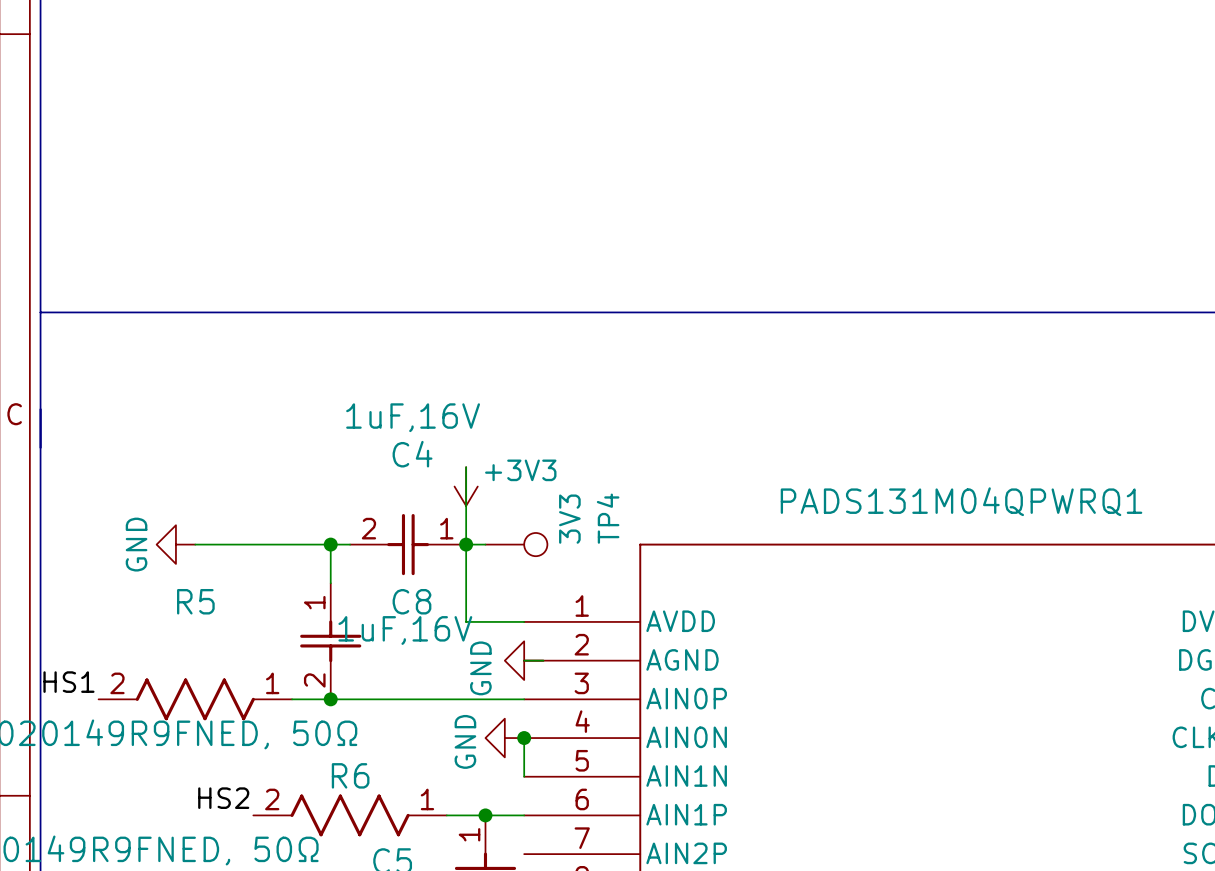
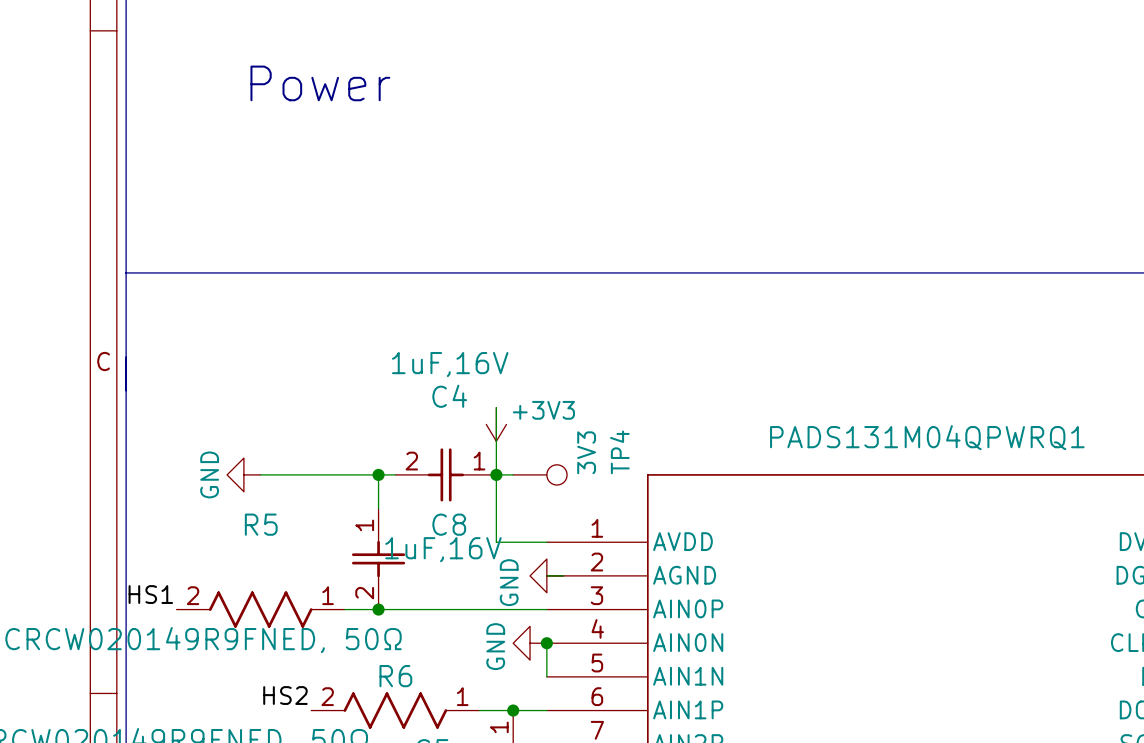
text: none -> Power (320, 83)

